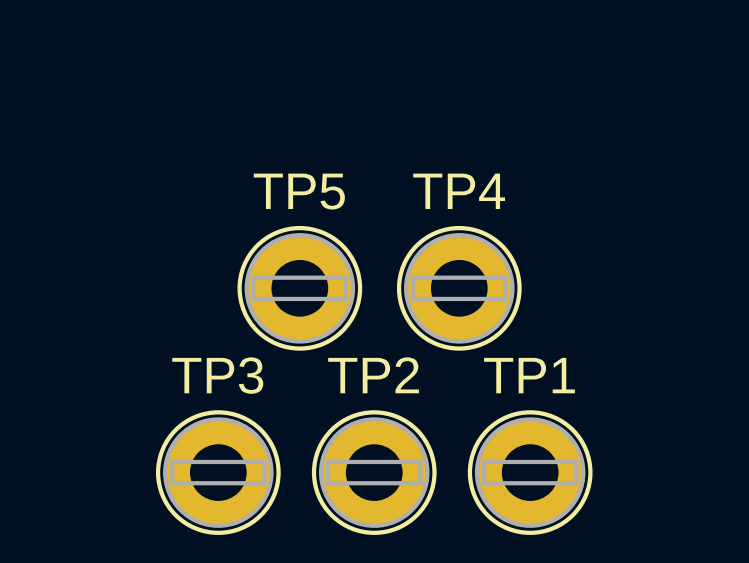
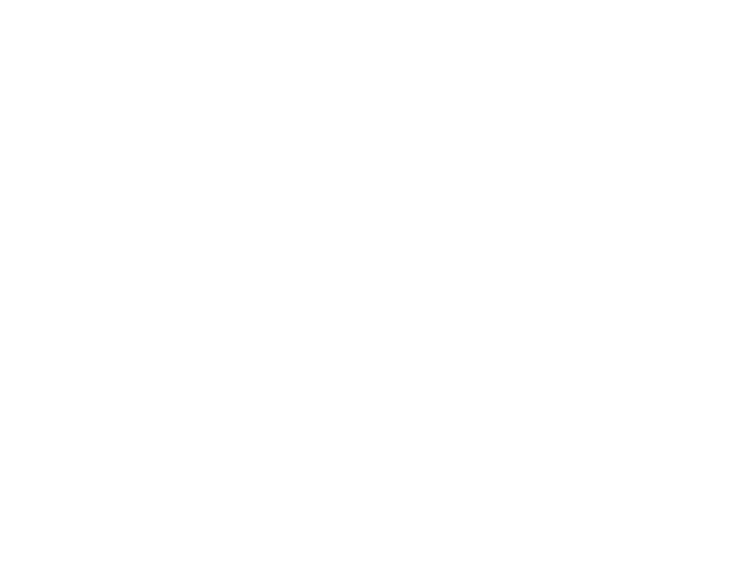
TP5: (299, 288) -> none
TP4: (459, 288) -> none
TP3: (218, 472) -> none
TP2: (374, 472) -> none
TP1: (530, 472) -> none

